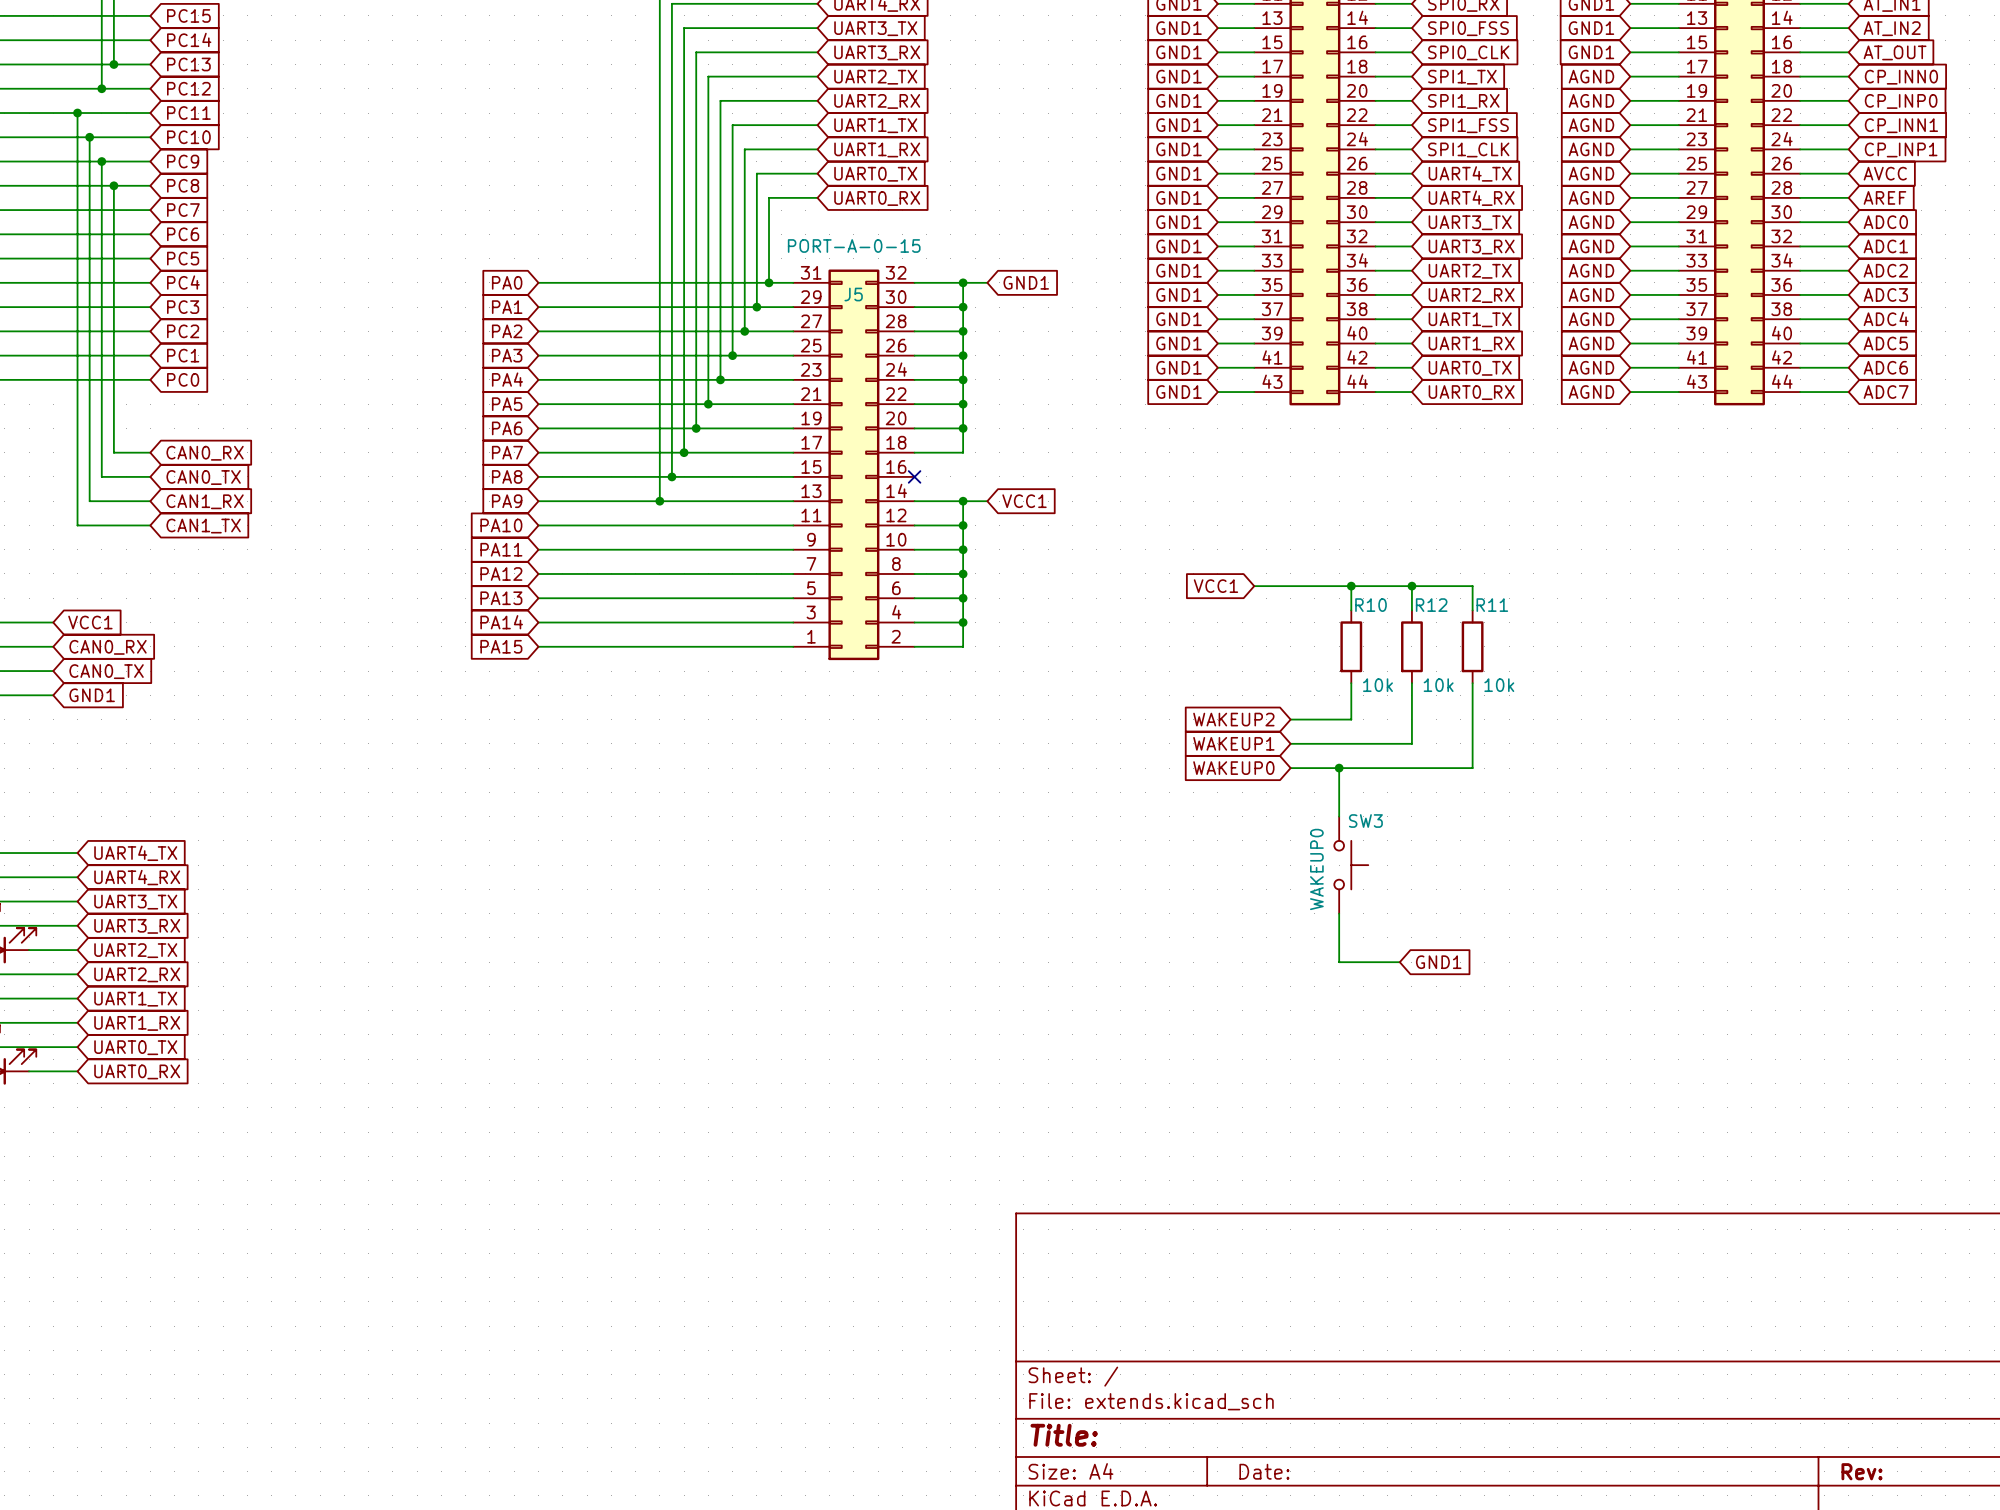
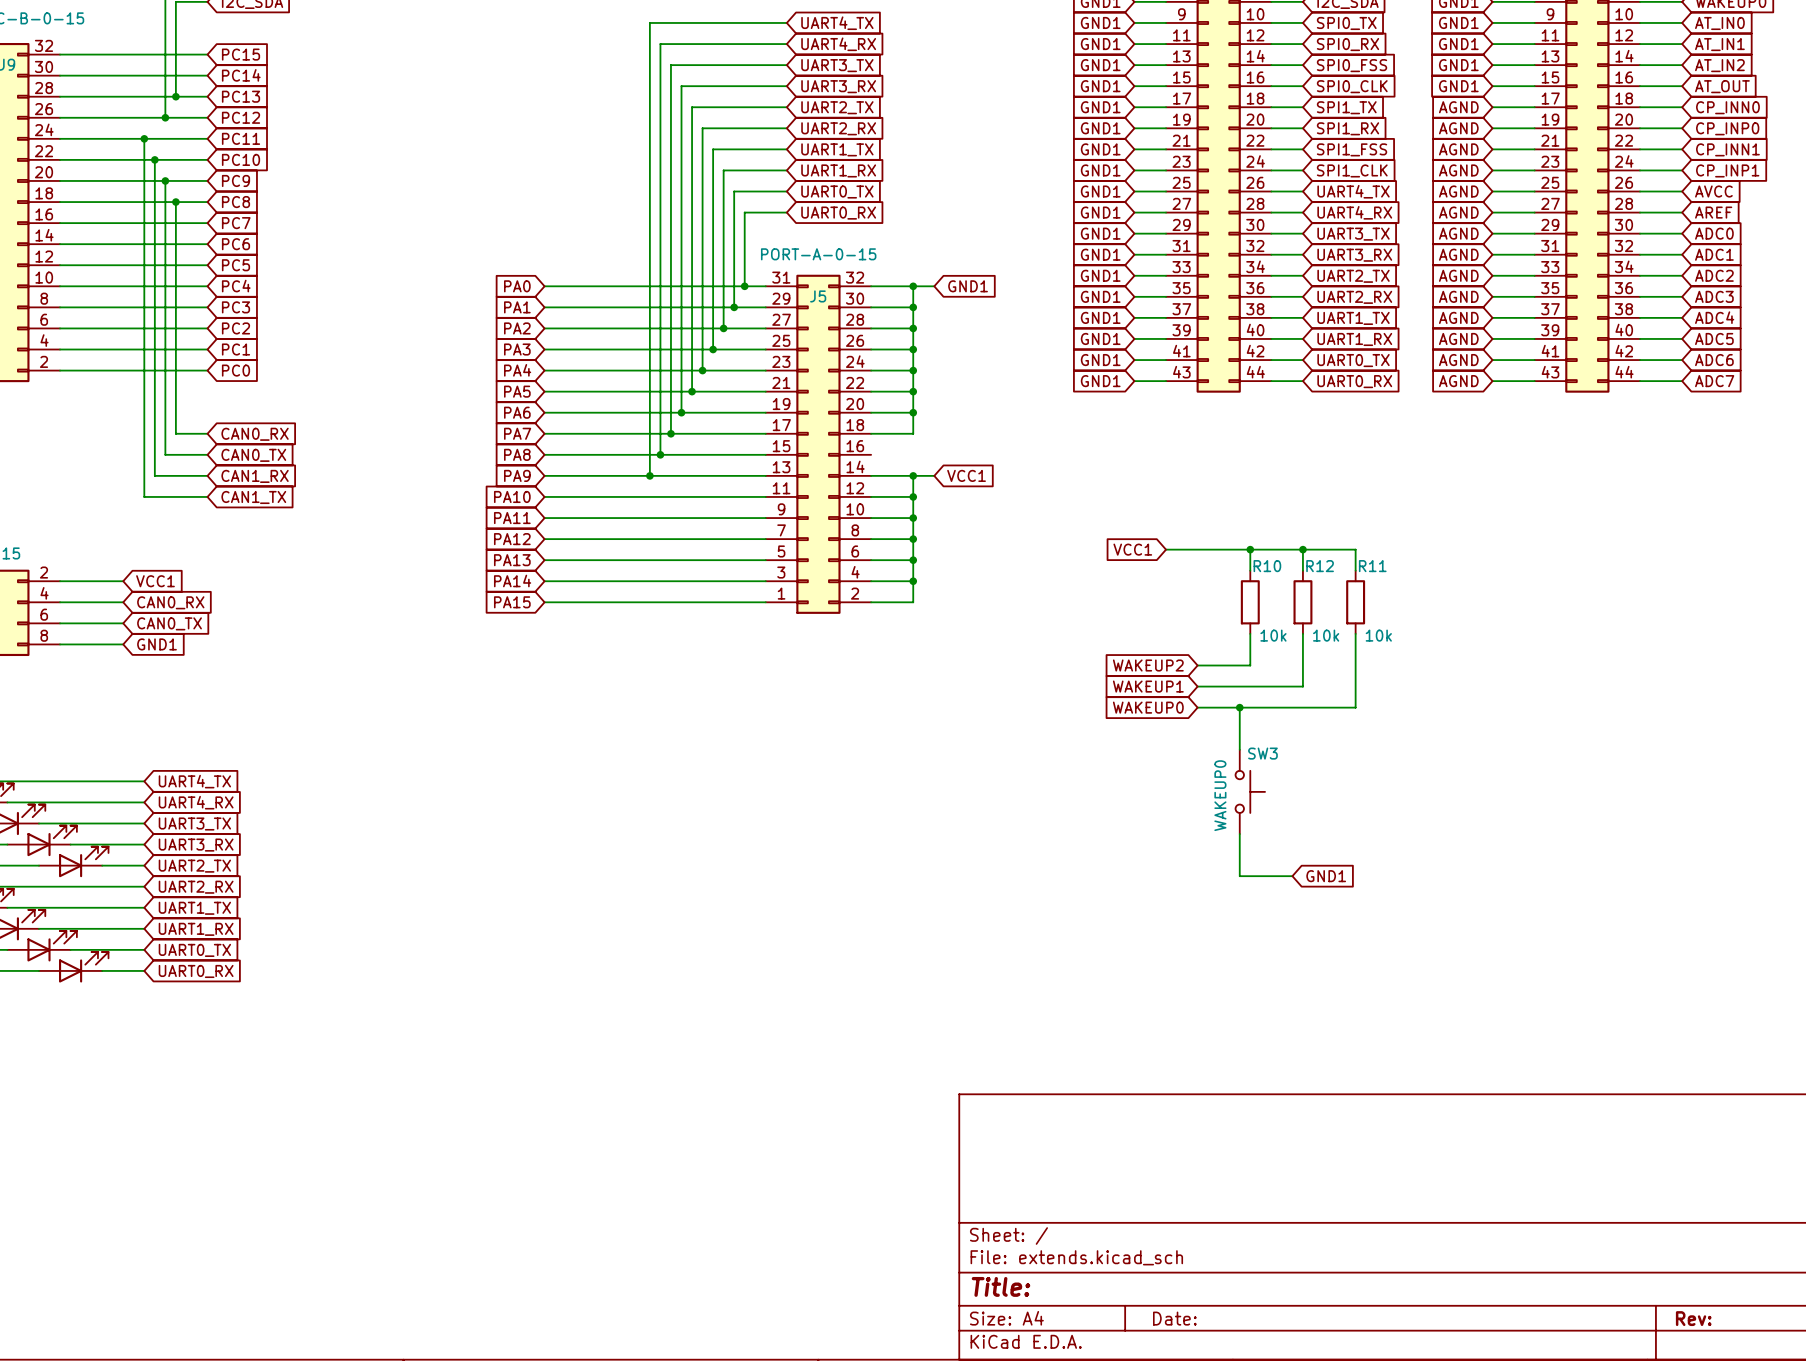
no-connect mark: (914, 476) -> none

